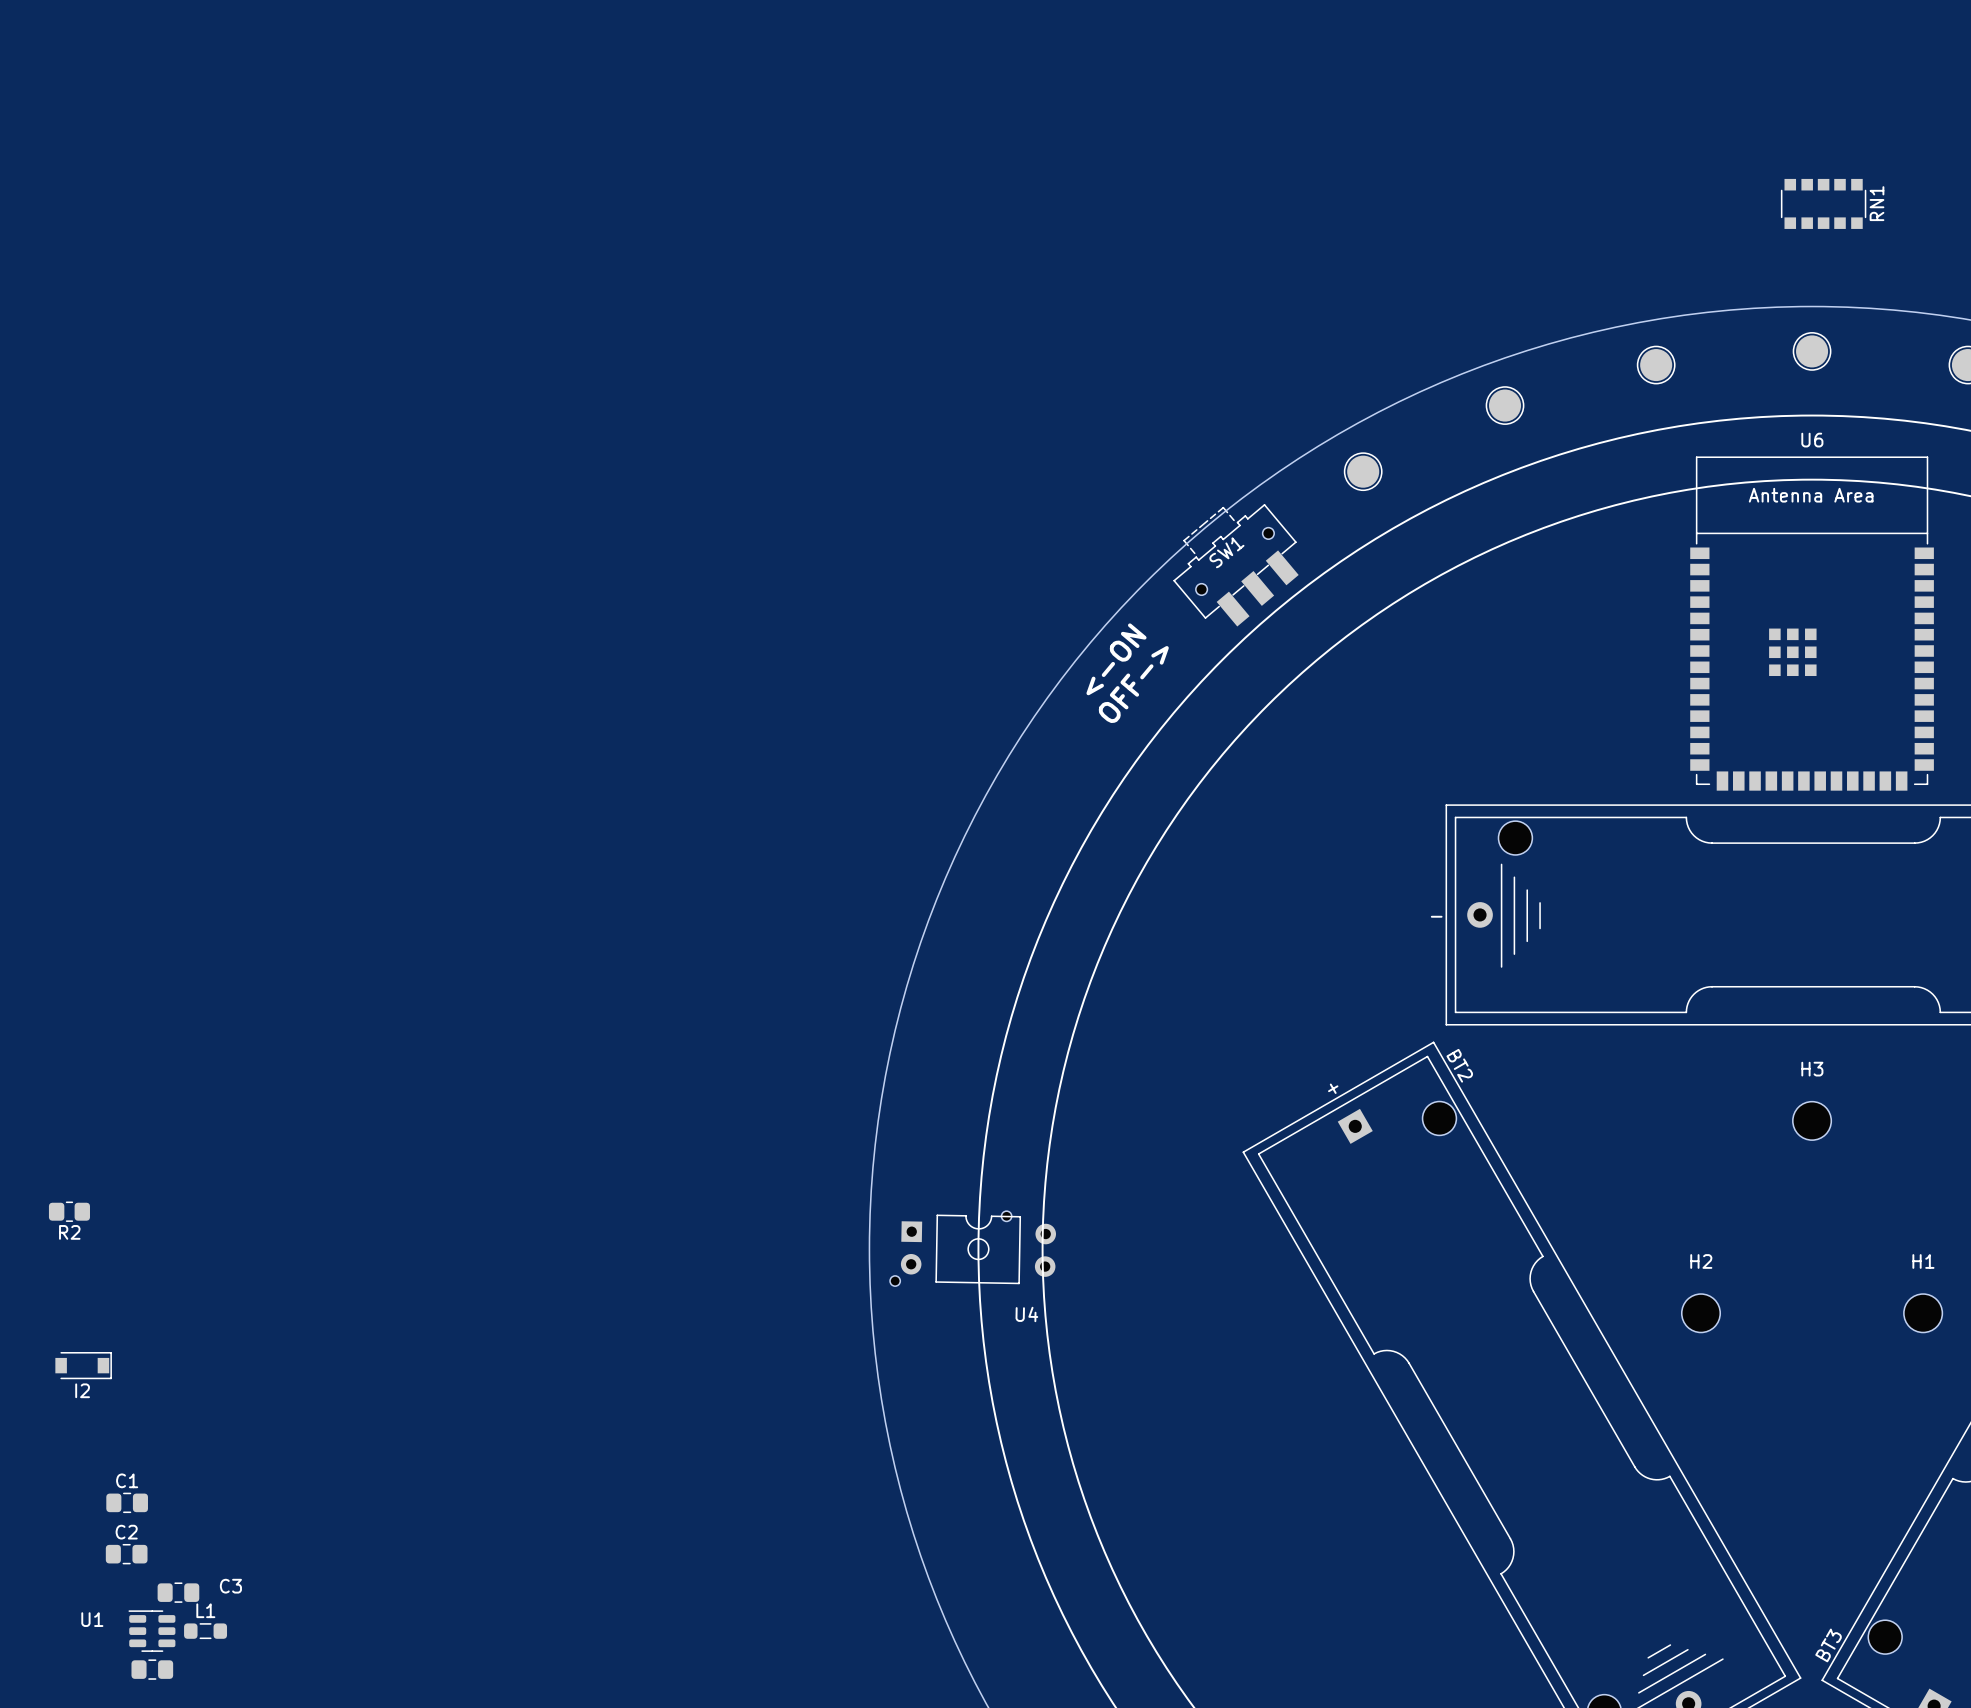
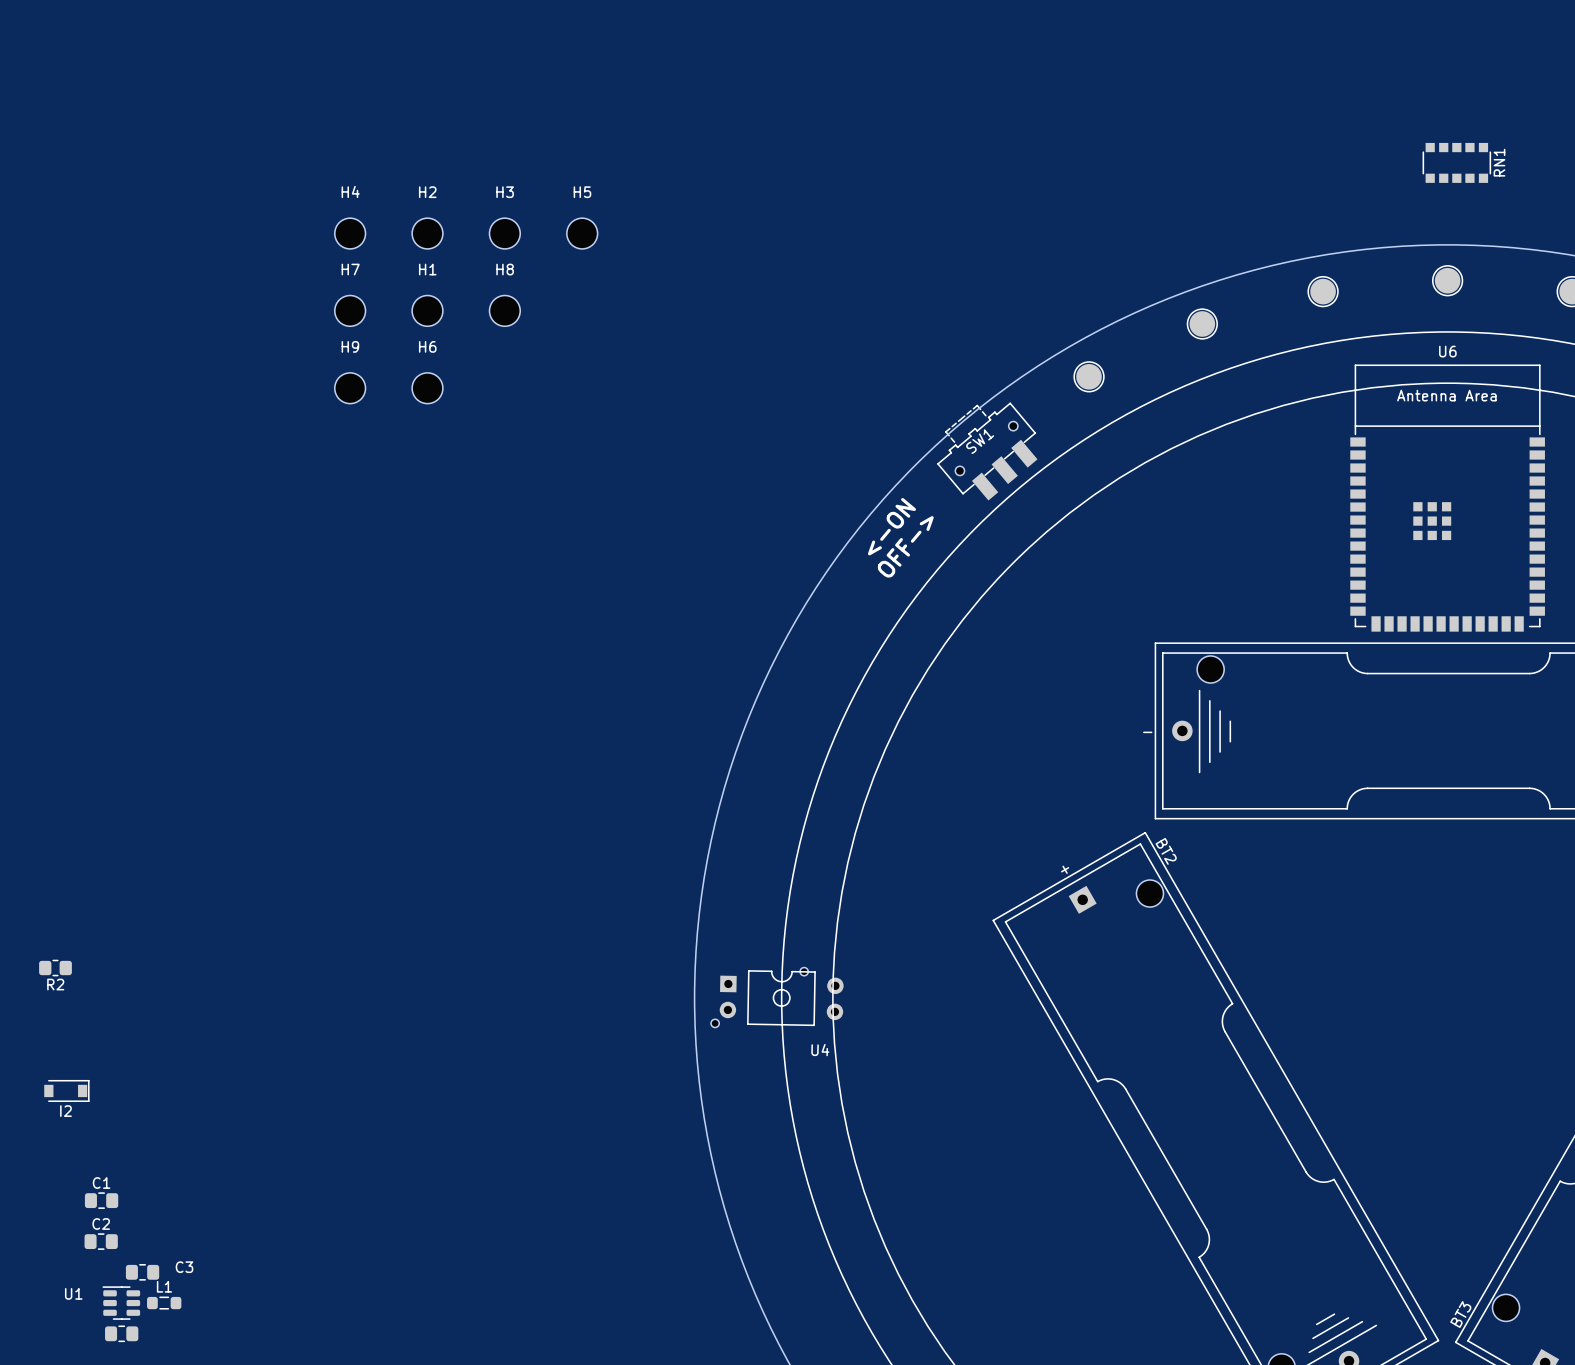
H4: none -> (350, 233)
H5: none -> (582, 233)
H7: none -> (350, 310)
H8: none -> (504, 310)
H9: none -> (350, 388)
H6: none -> (427, 388)
H3 position: (1812, 1120) -> (504, 233)
H2 position: (1700, 1313) -> (427, 233)
H1 position: (1923, 1313) -> (427, 310)

